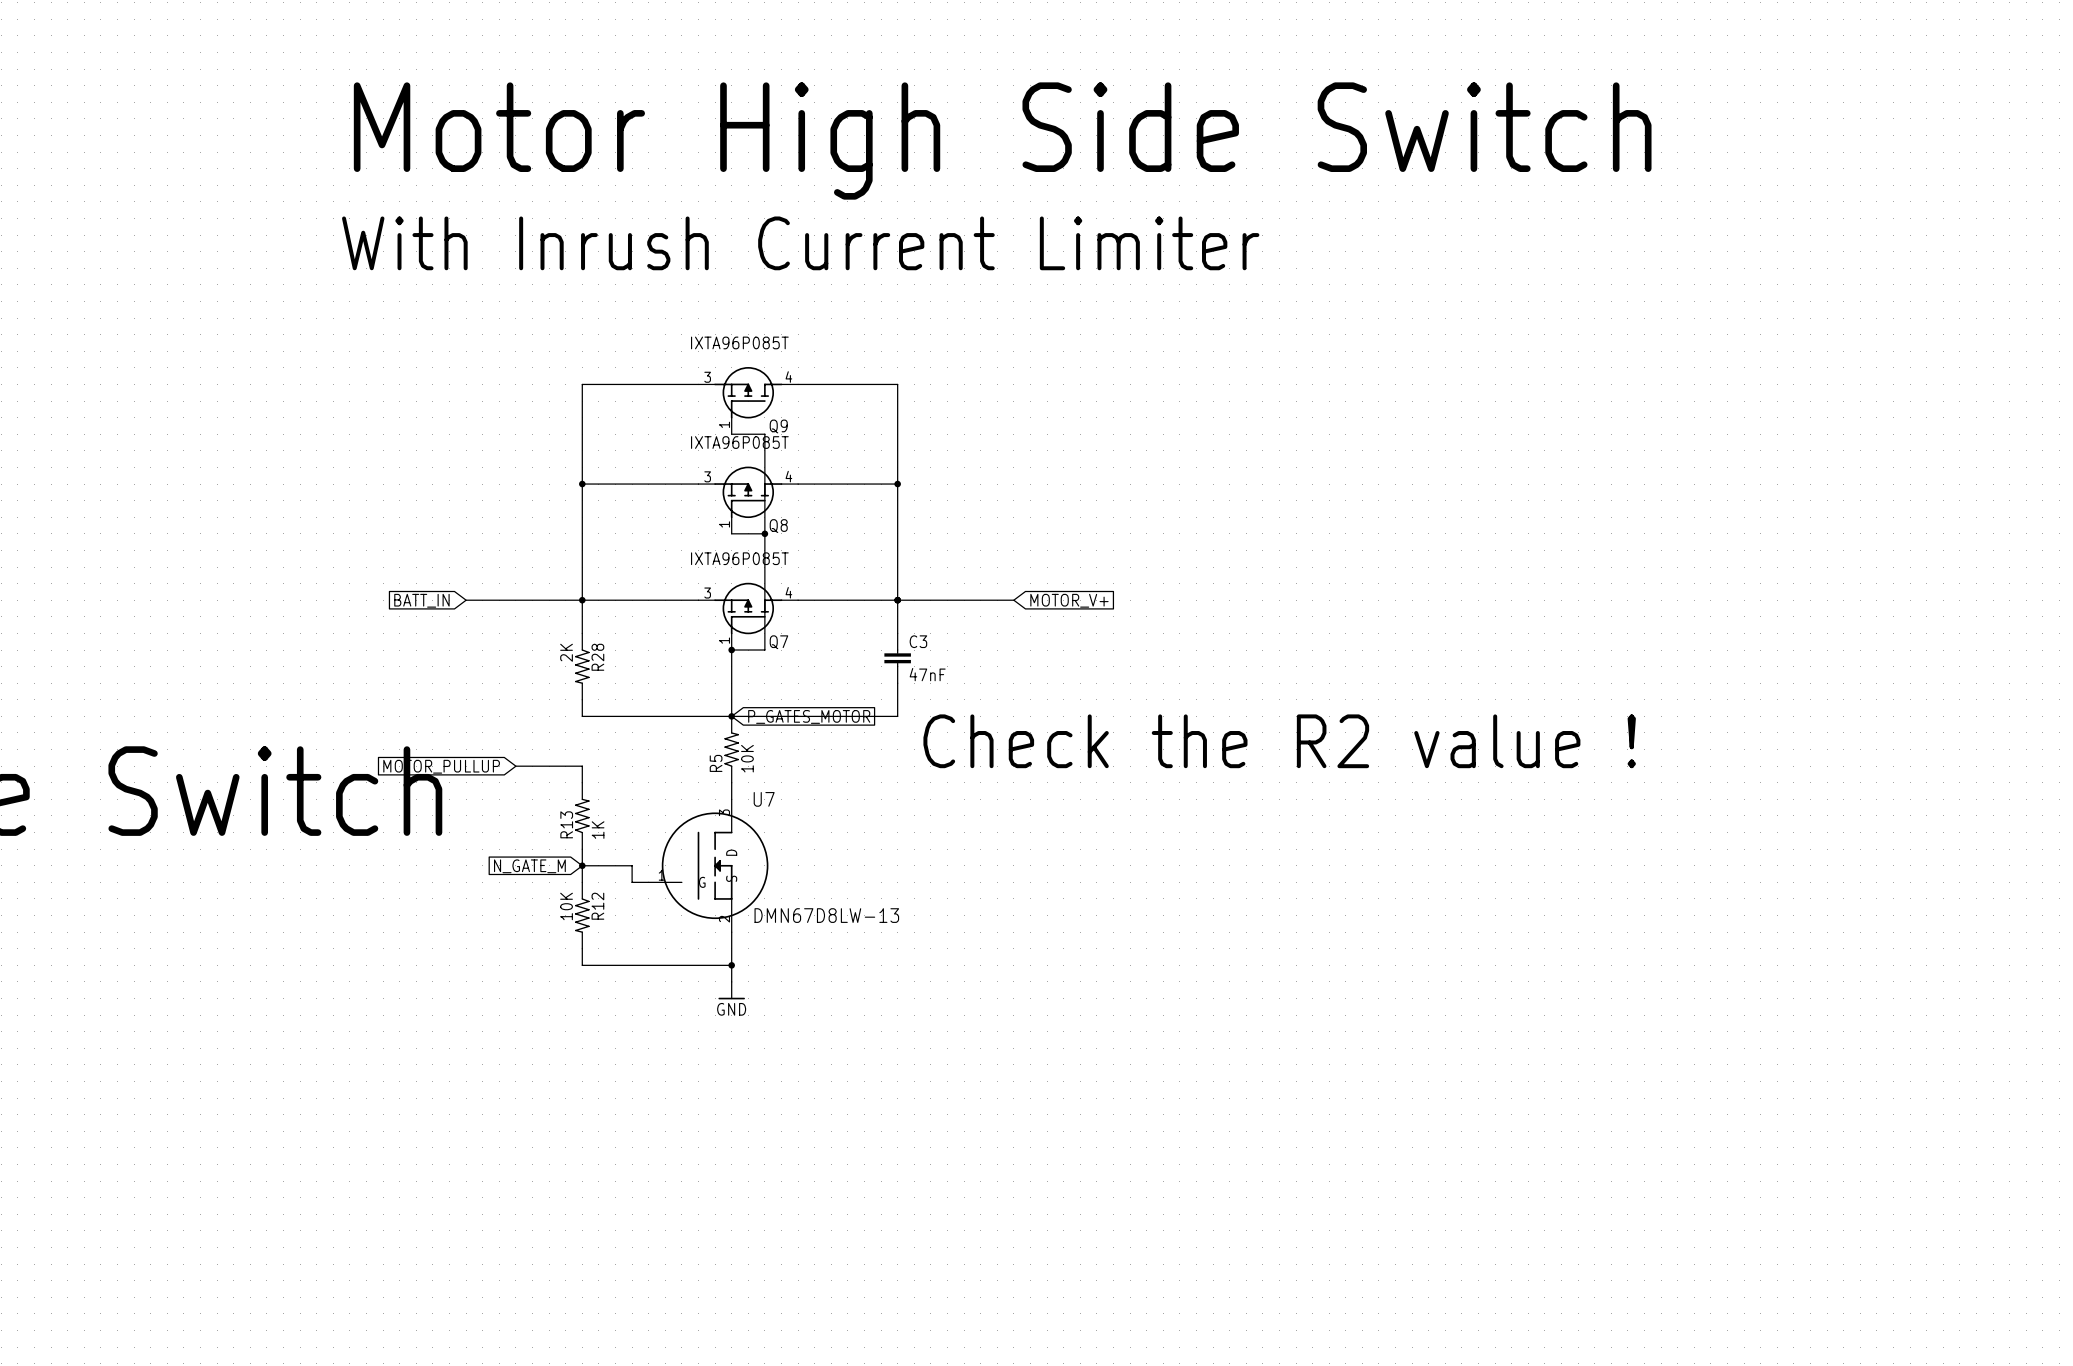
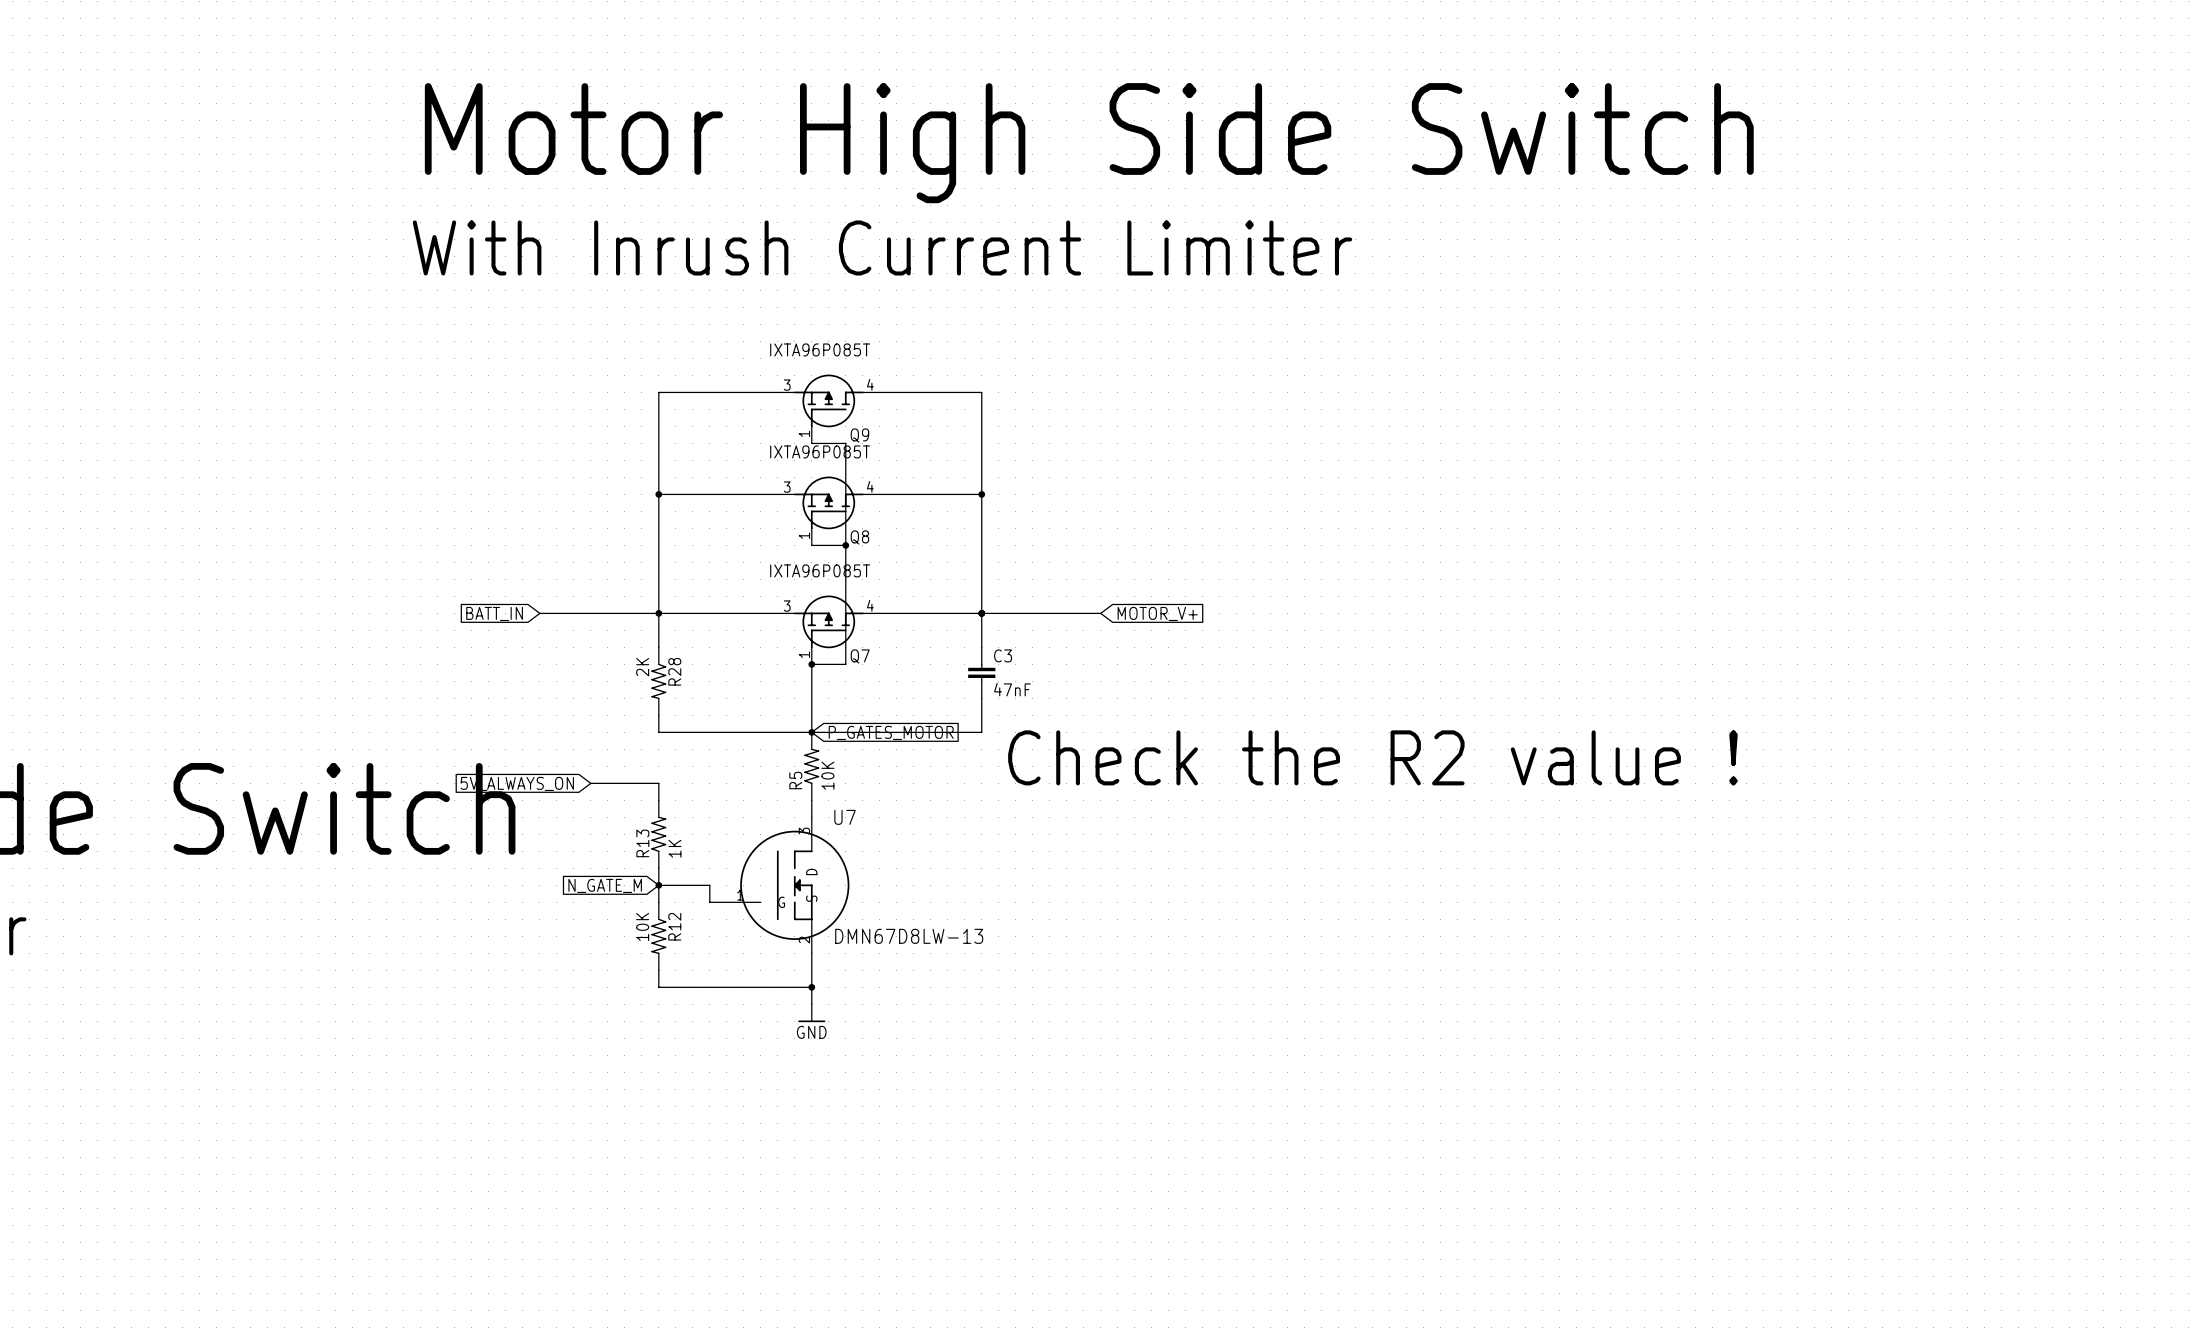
global label: MOTOR_PULLUP (441, 766) -> 5V_ALWAYS_ON (517, 783)

